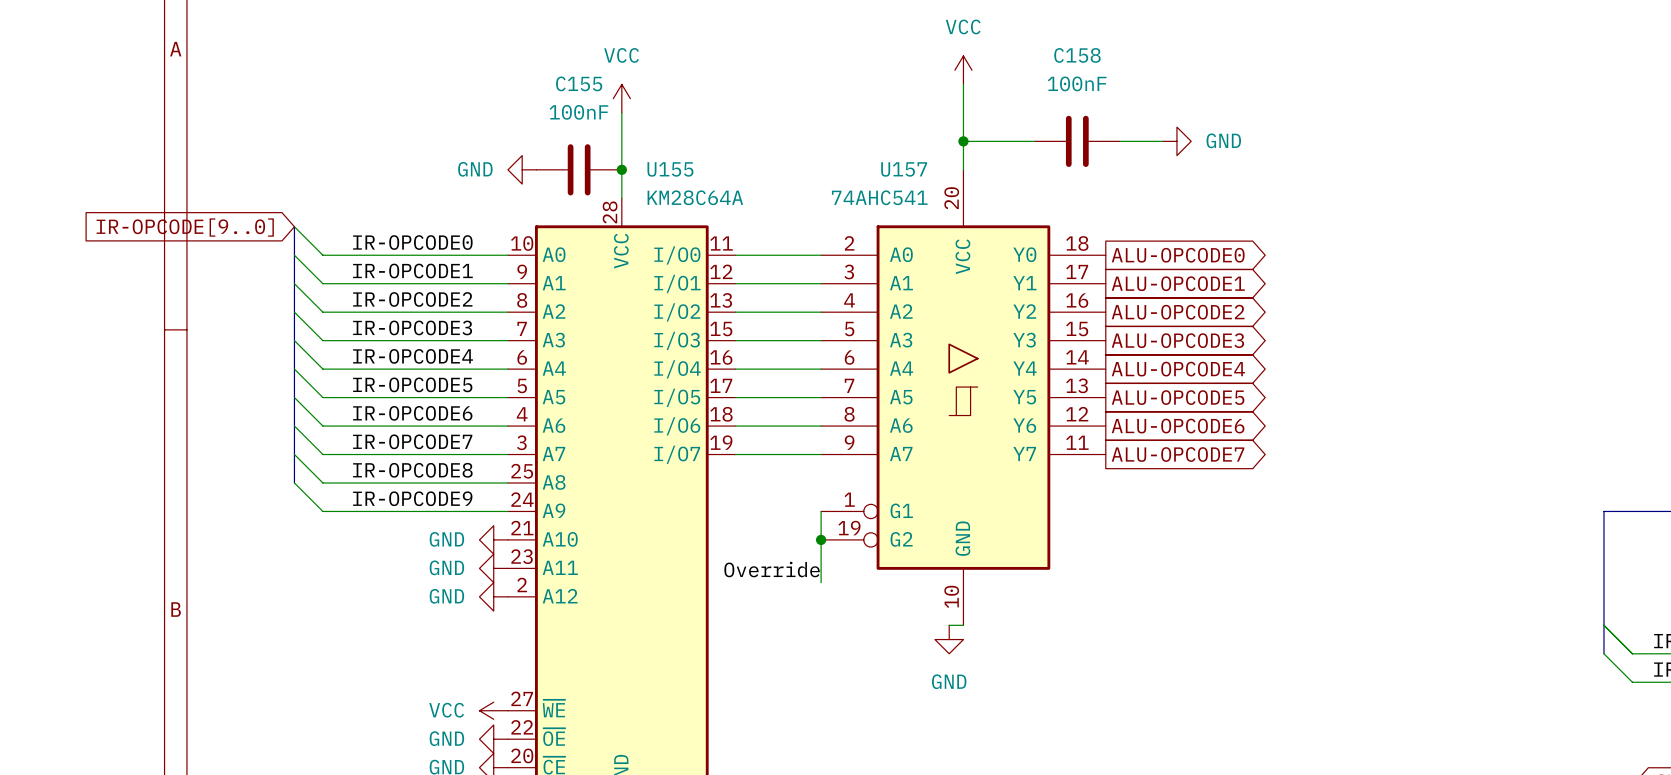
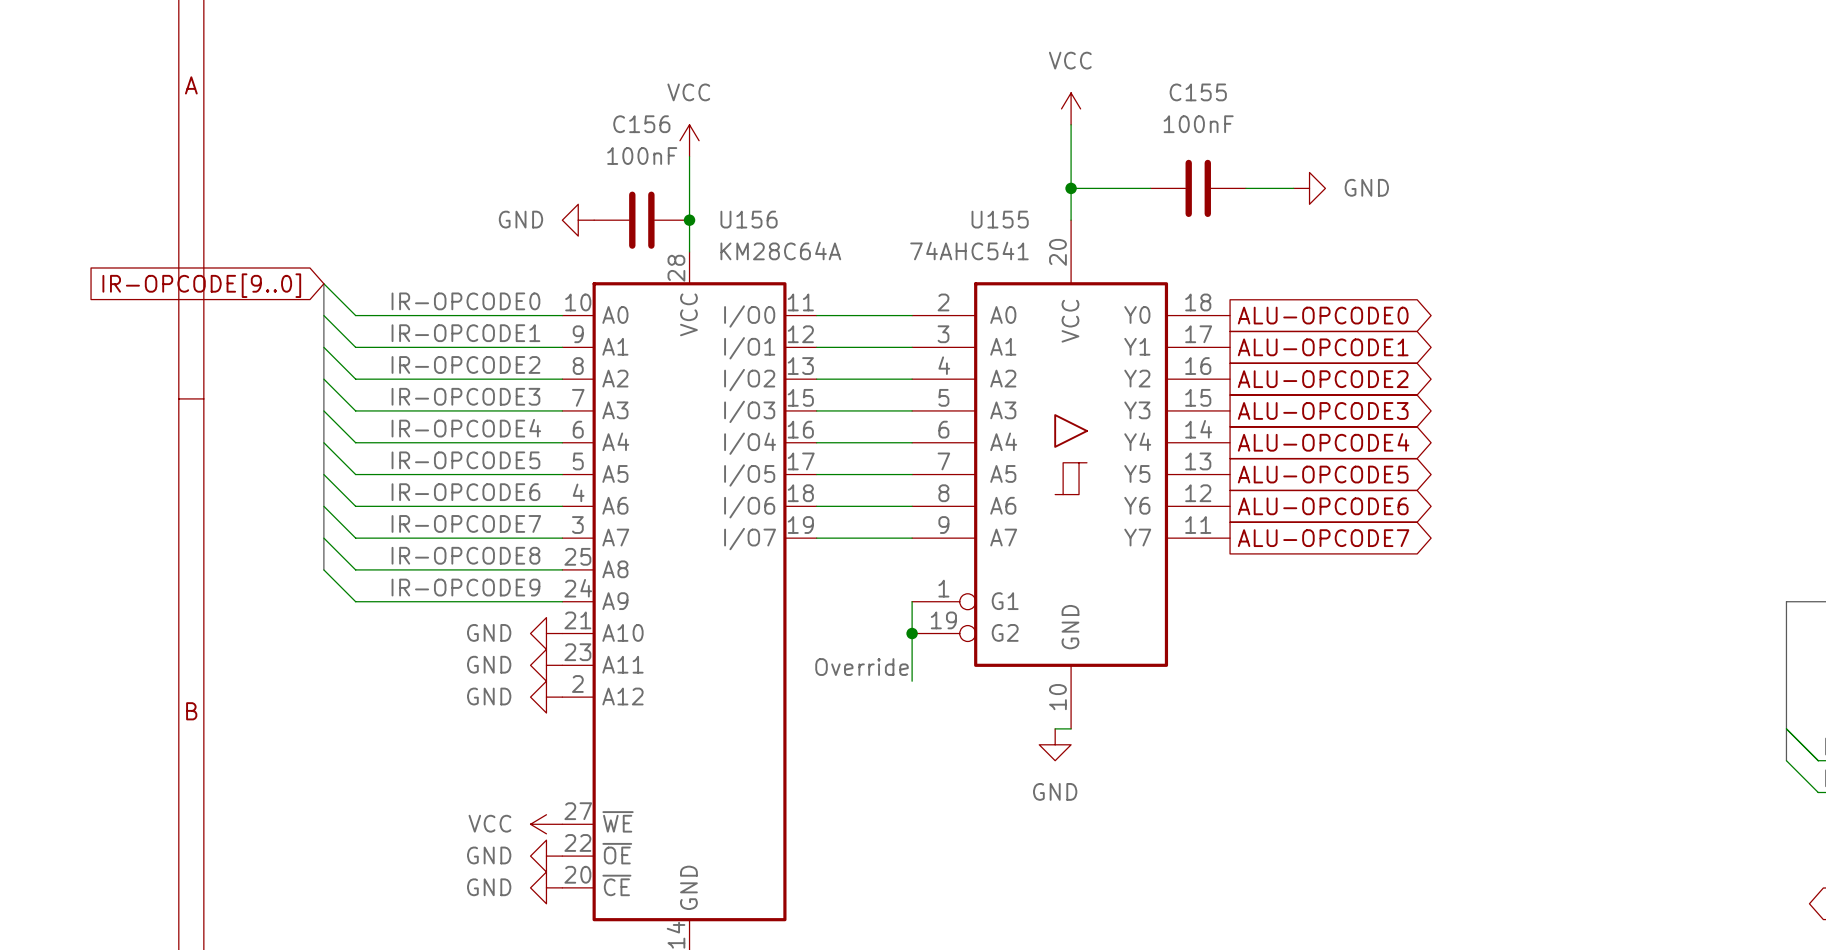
C158 name: C158 (1077, 55) -> C155 (1198, 92)
C155 name: C155 (579, 83) -> C156 (641, 124)
U155 name: U155 (670, 169) -> U156 (749, 219)
U157 name: U157 (904, 169) -> U155 (1000, 219)

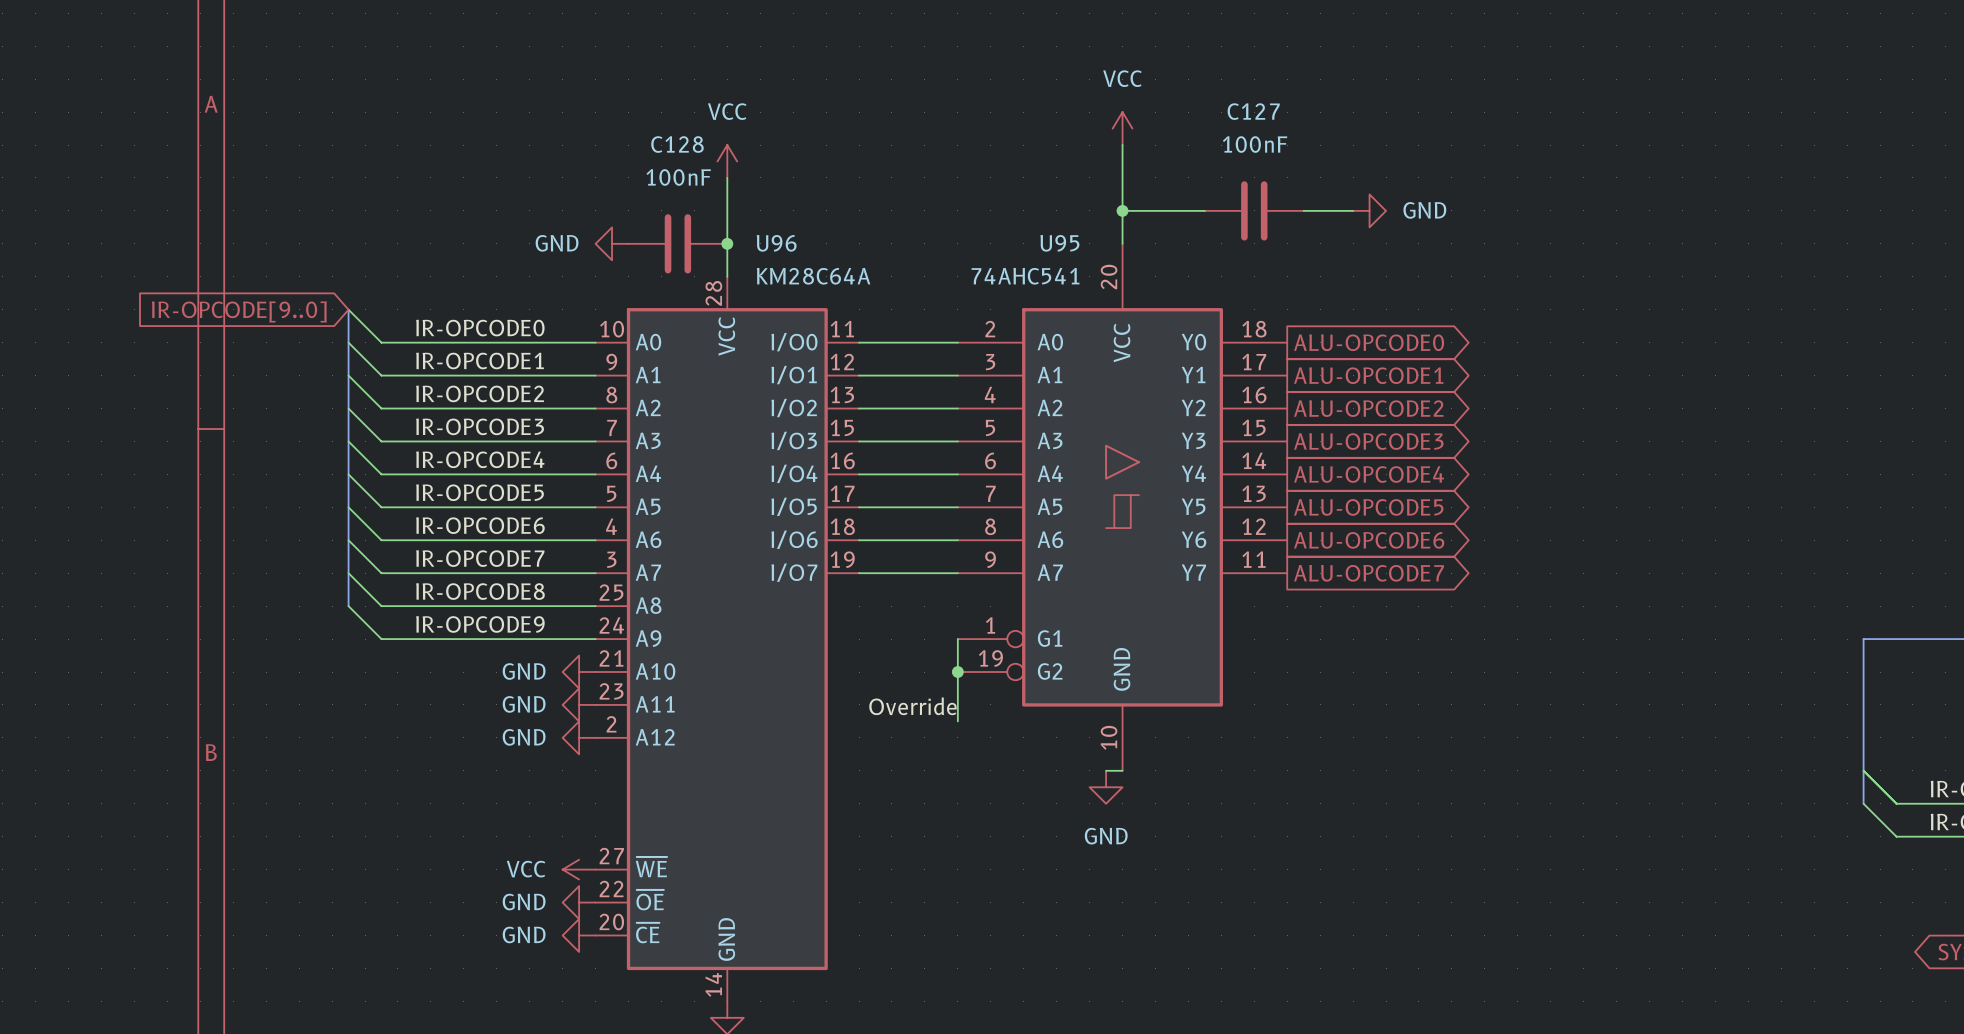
C155 name: C155 (1198, 92) -> C127 (1253, 111)
C156 name: C156 (641, 124) -> C128 (677, 144)
U156 name: U156 (749, 219) -> U96 (776, 243)
U155 name: U155 (1000, 219) -> U95 (1059, 243)

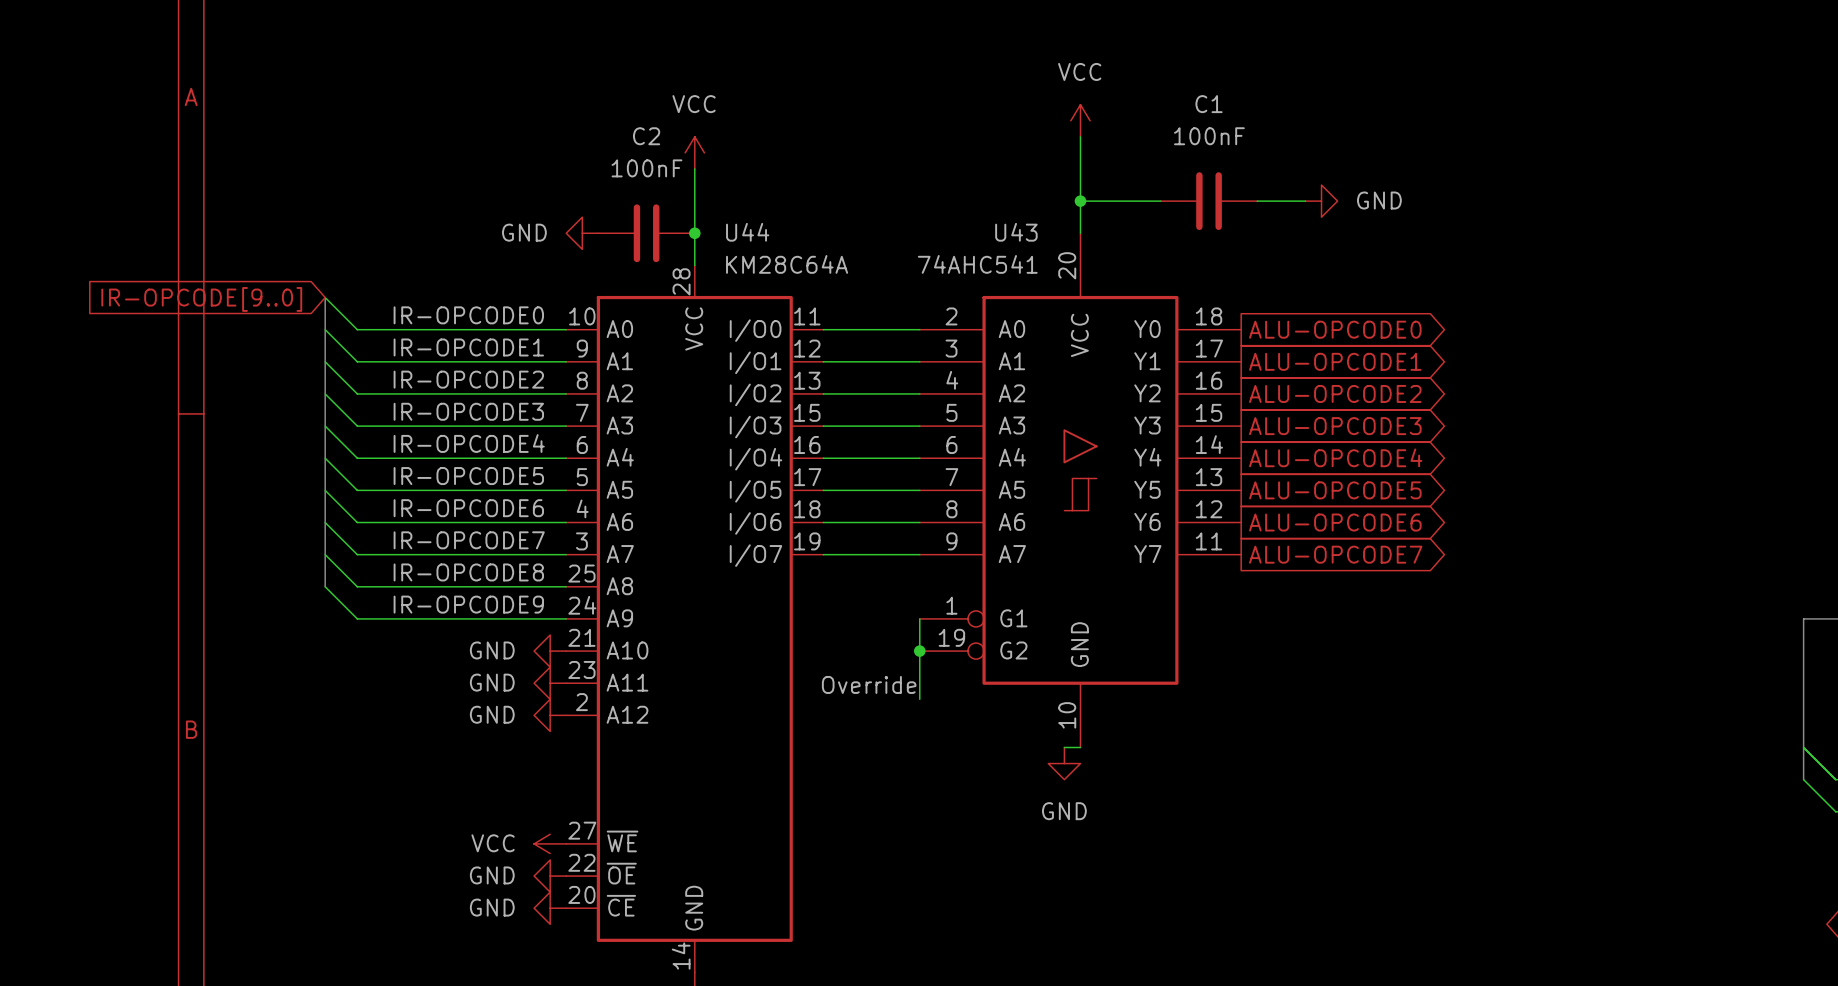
C127 name: C127 (1253, 111) -> C1 (1209, 104)
C128 name: C128 (677, 144) -> C2 (646, 136)
U96 name: U96 (776, 243) -> U44 (747, 232)
U95 name: U95 (1059, 243) -> U43 (1016, 232)

